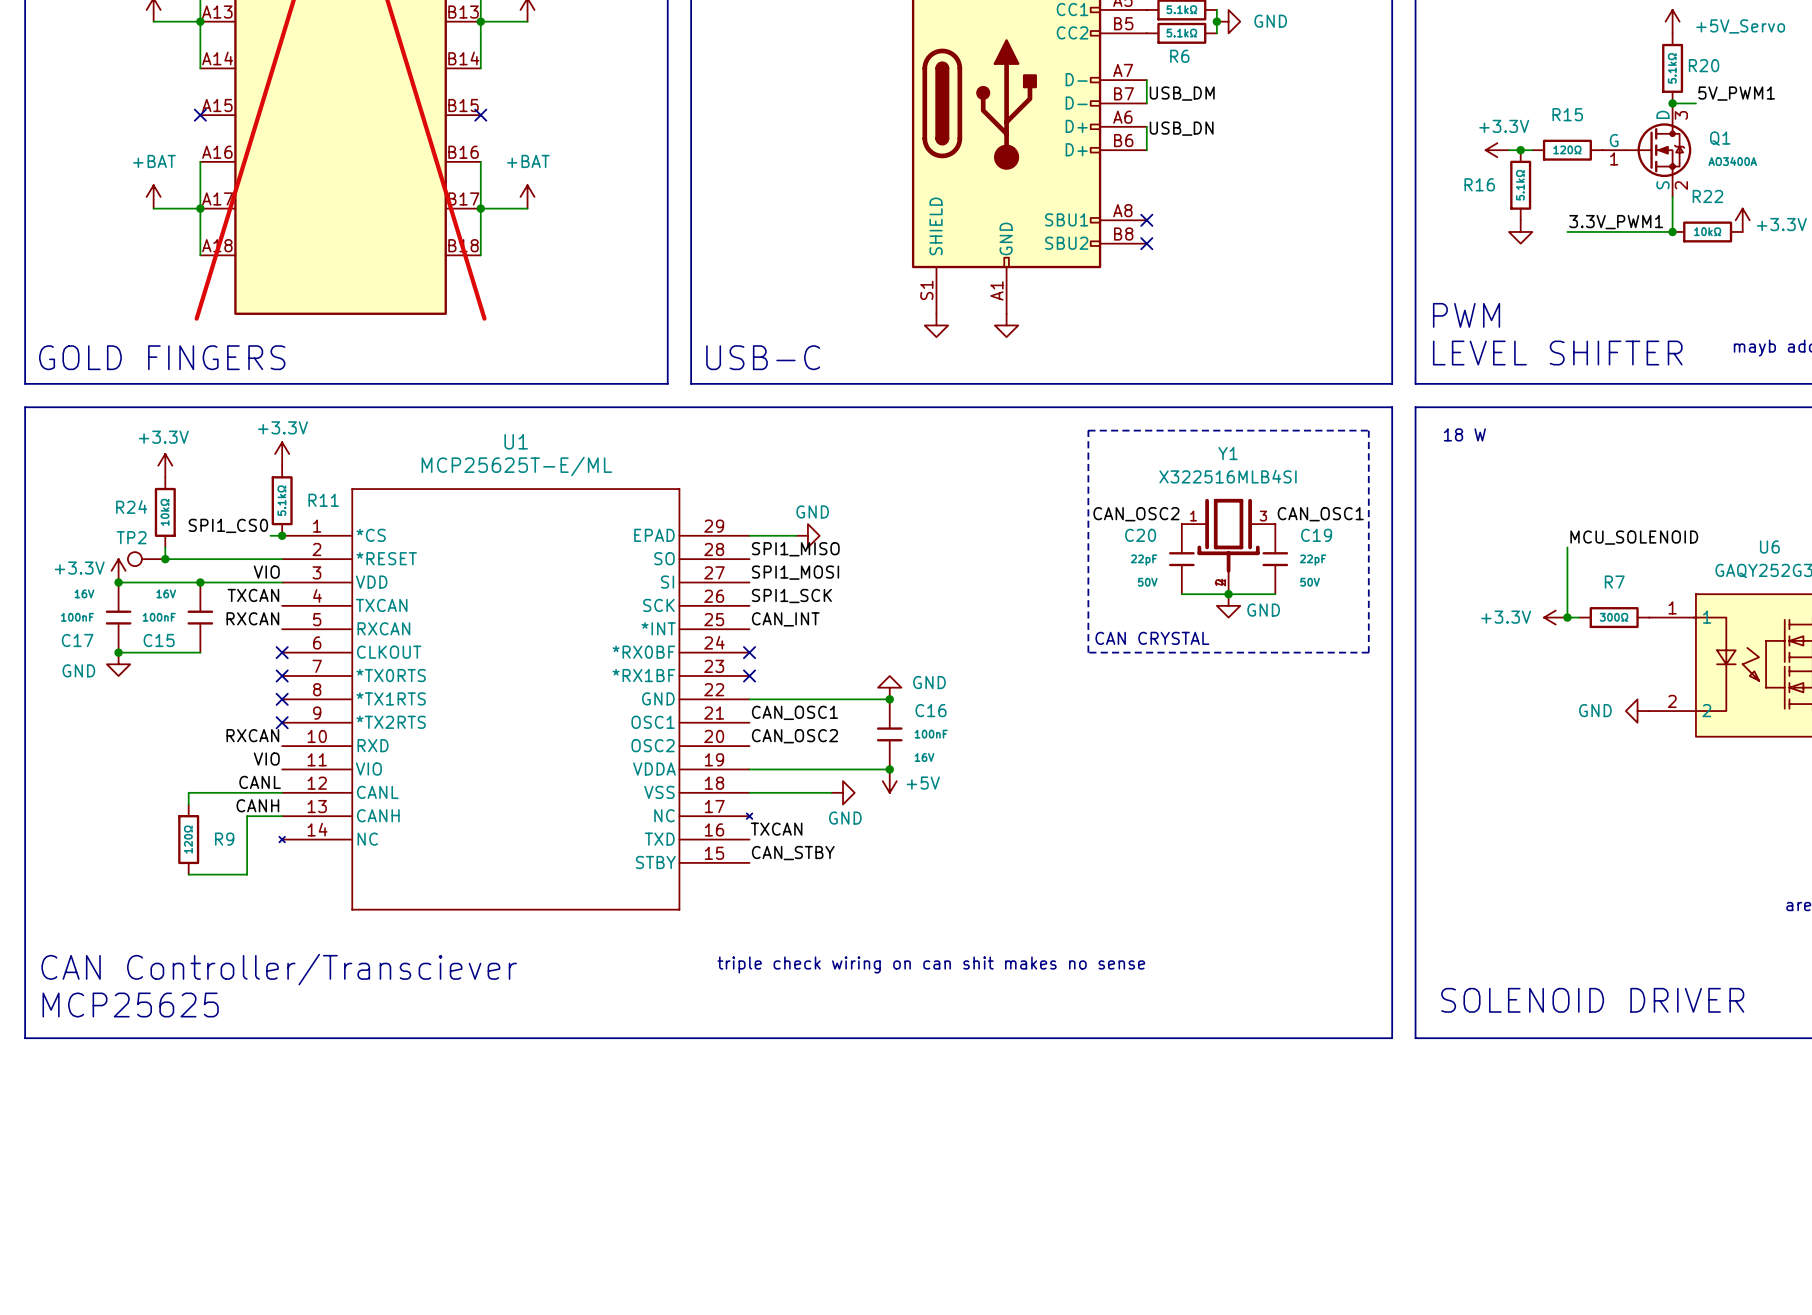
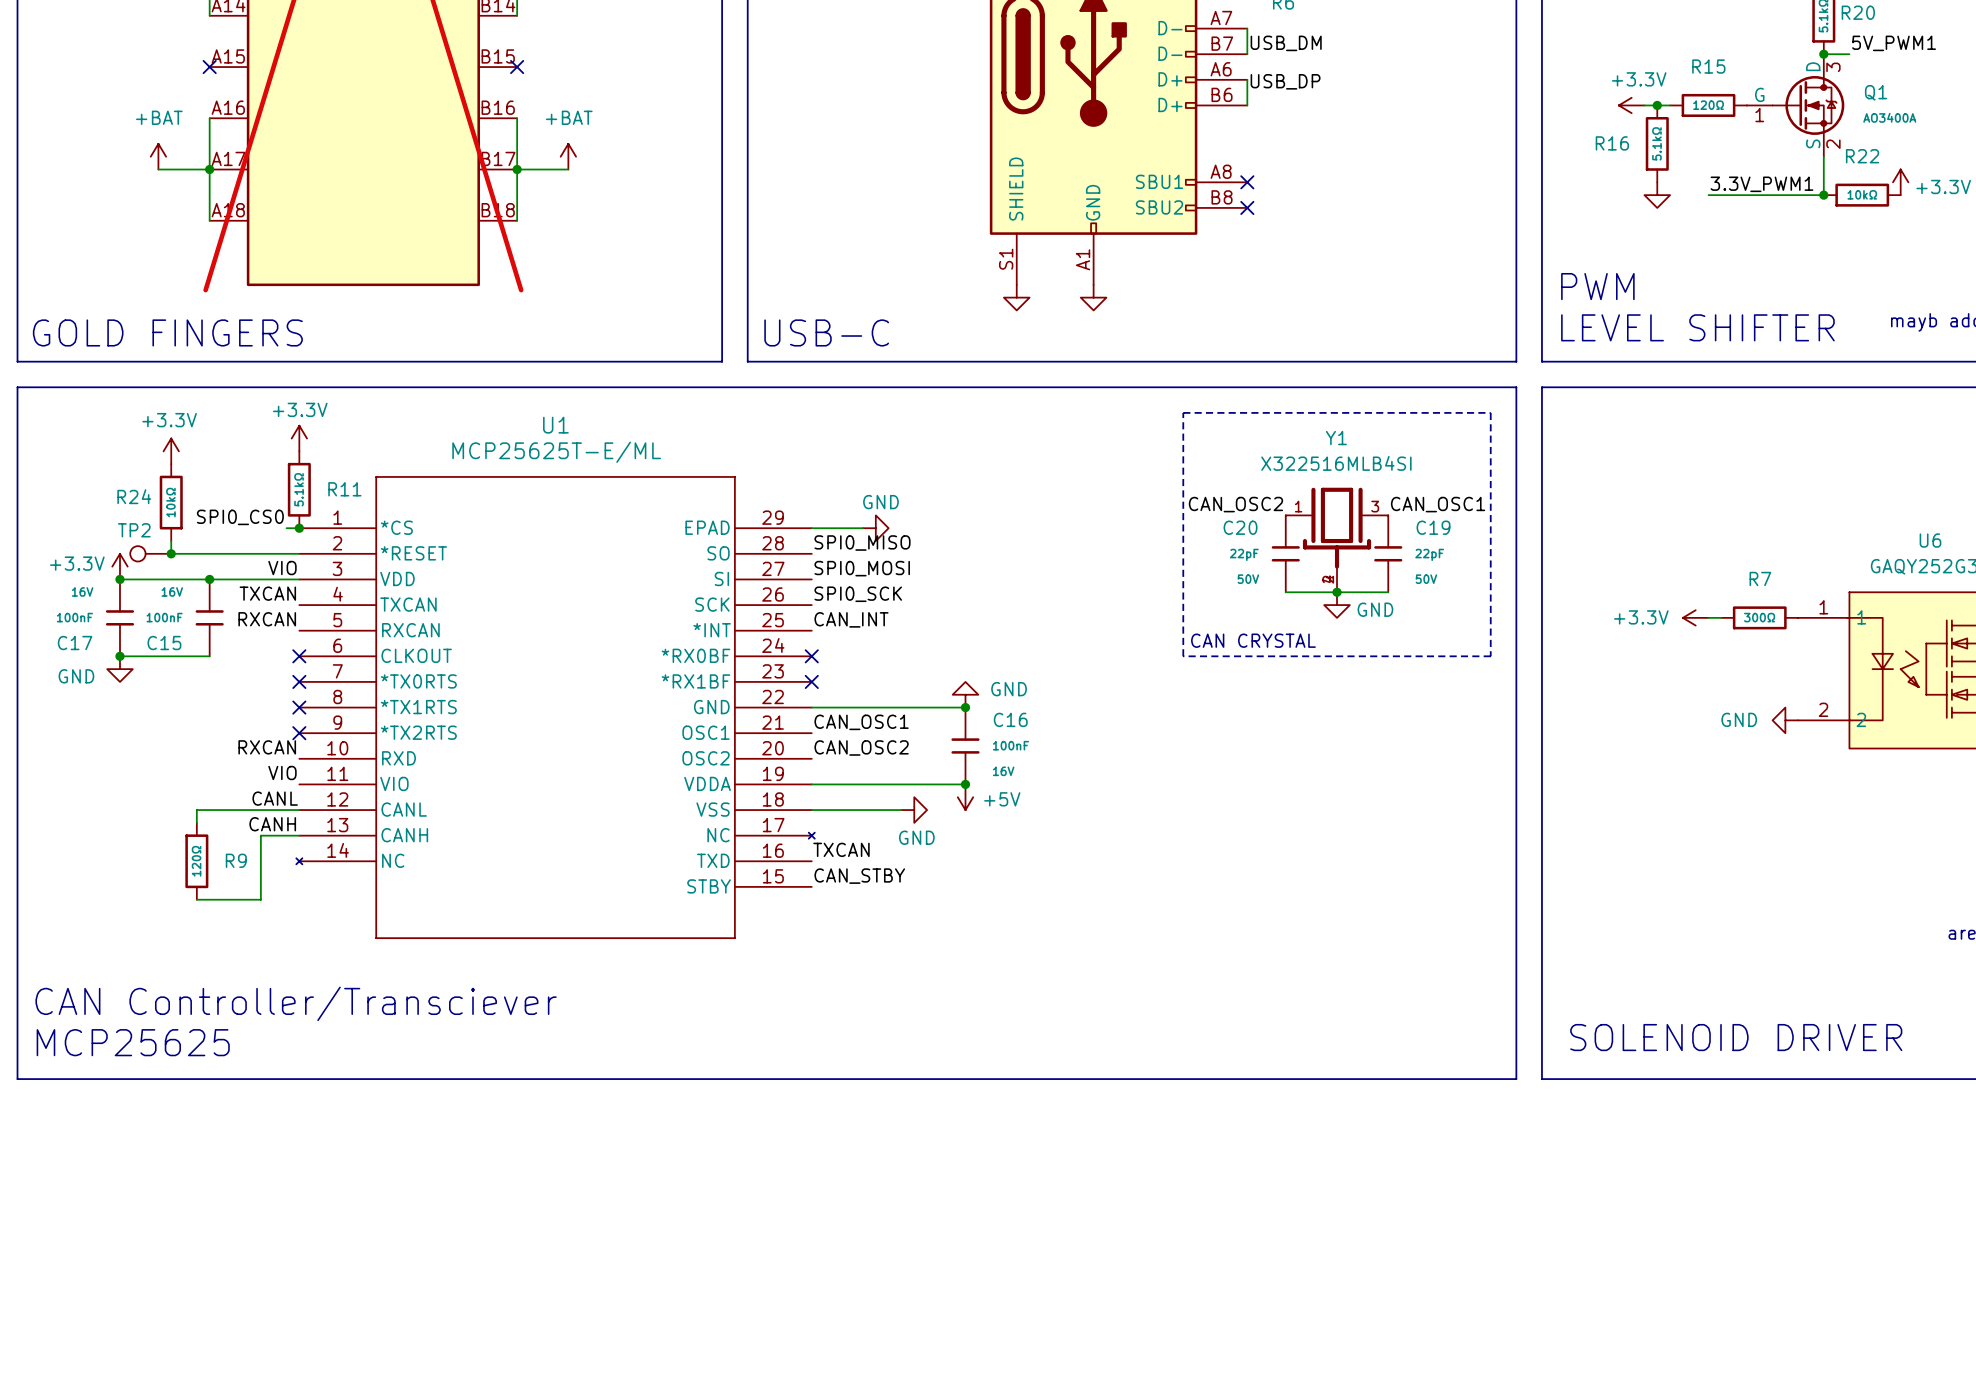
label: USB_DN (1181, 128) -> USB_DP (1285, 81)
text: 18 W (1464, 434) -> none
label: SPI1_CS0 (228, 525) -> SPI0_CS0 (240, 517)
label: MCU_SOLENOID (1634, 537) -> none
wire: (1567, 547) (1567, 617) -> none
label: SPI1_MISO (795, 549) -> SPI0_MISO (862, 543)
label: SPI1_MOSI (795, 572) -> SPI0_MOSI (862, 568)
label: SPI1_SCK (791, 596) -> SPI0_SCK (858, 594)
junction: (1567, 617) -> none
text: triple check wiring on can shit makes no sense (931, 964) -> none

